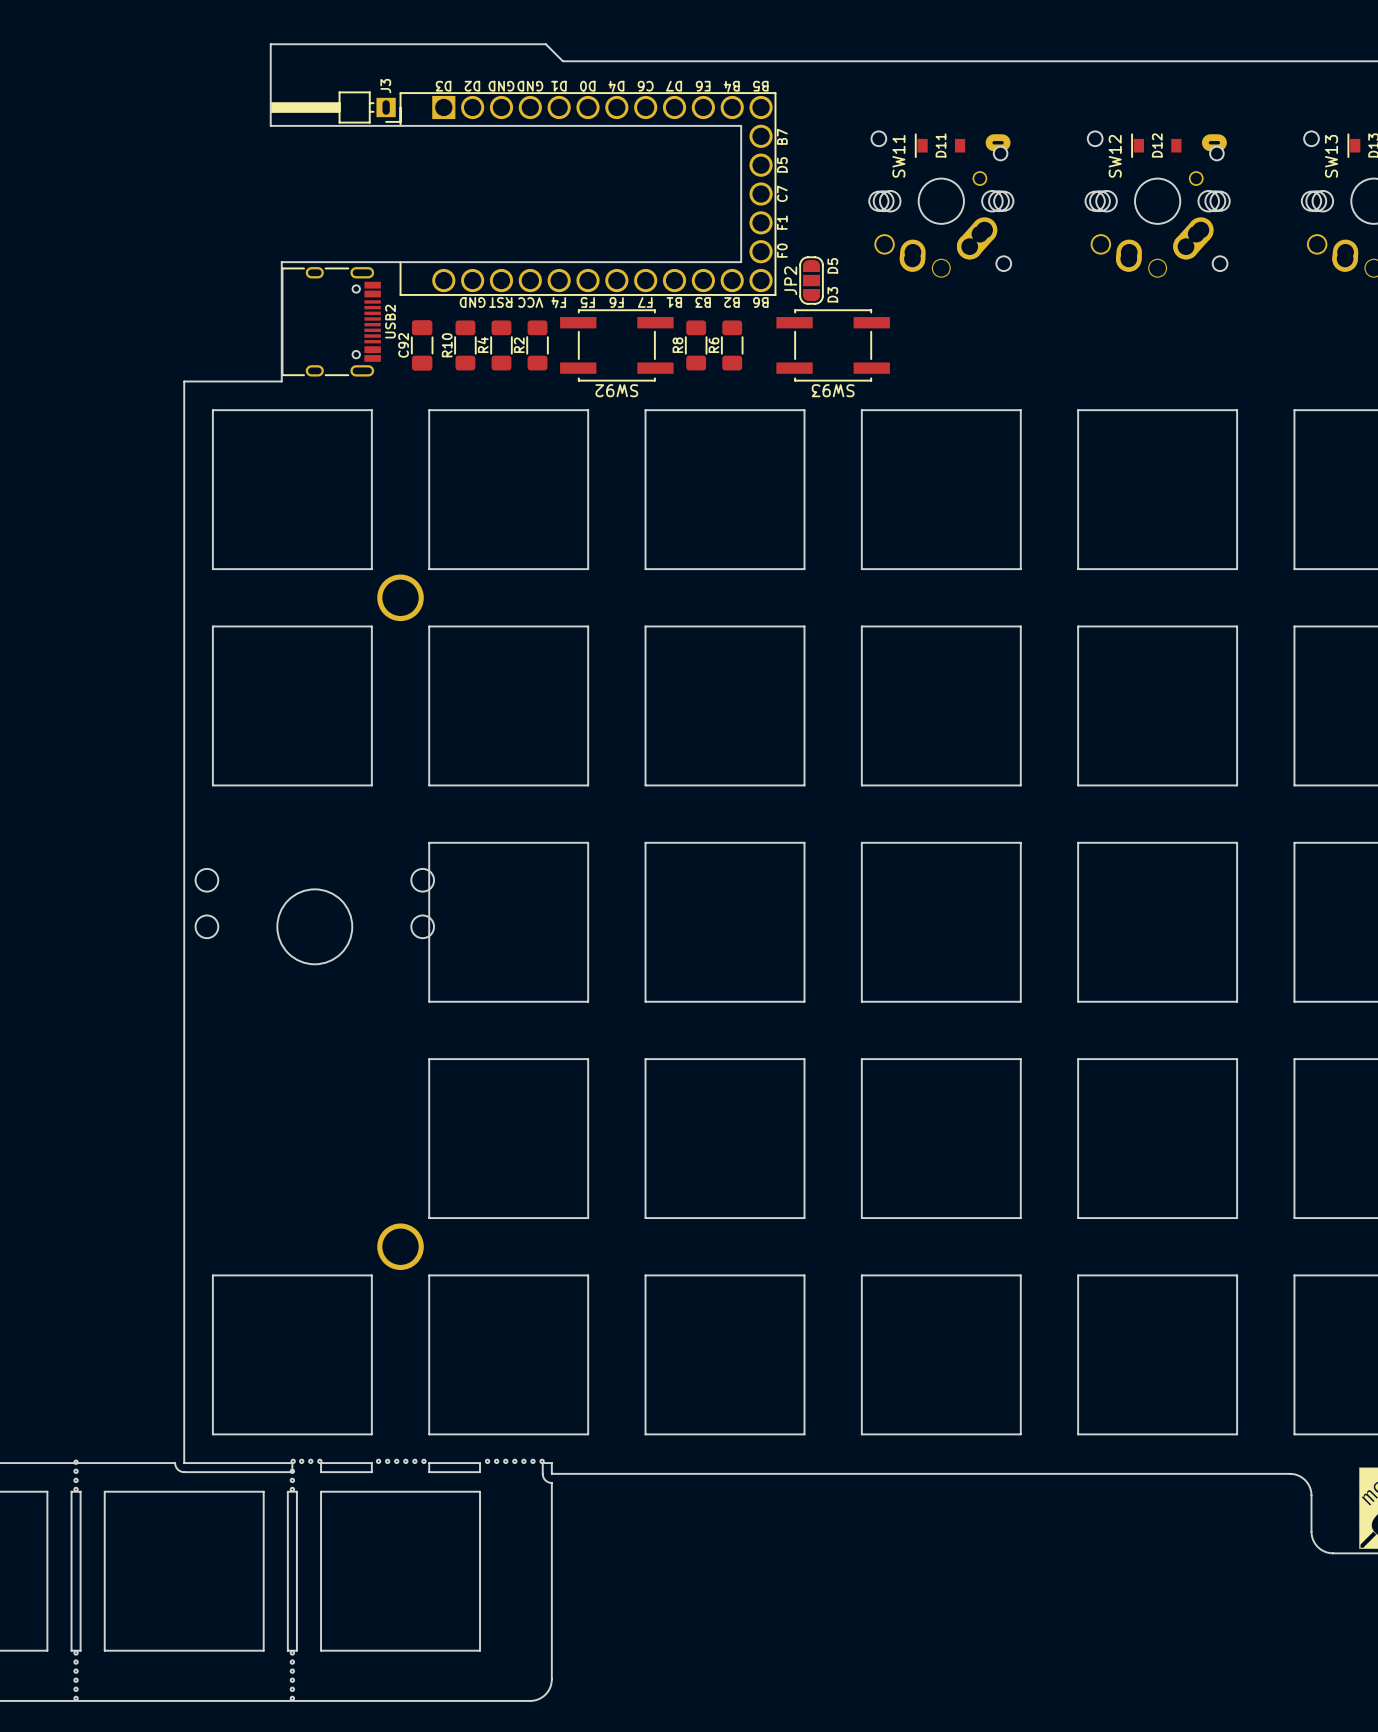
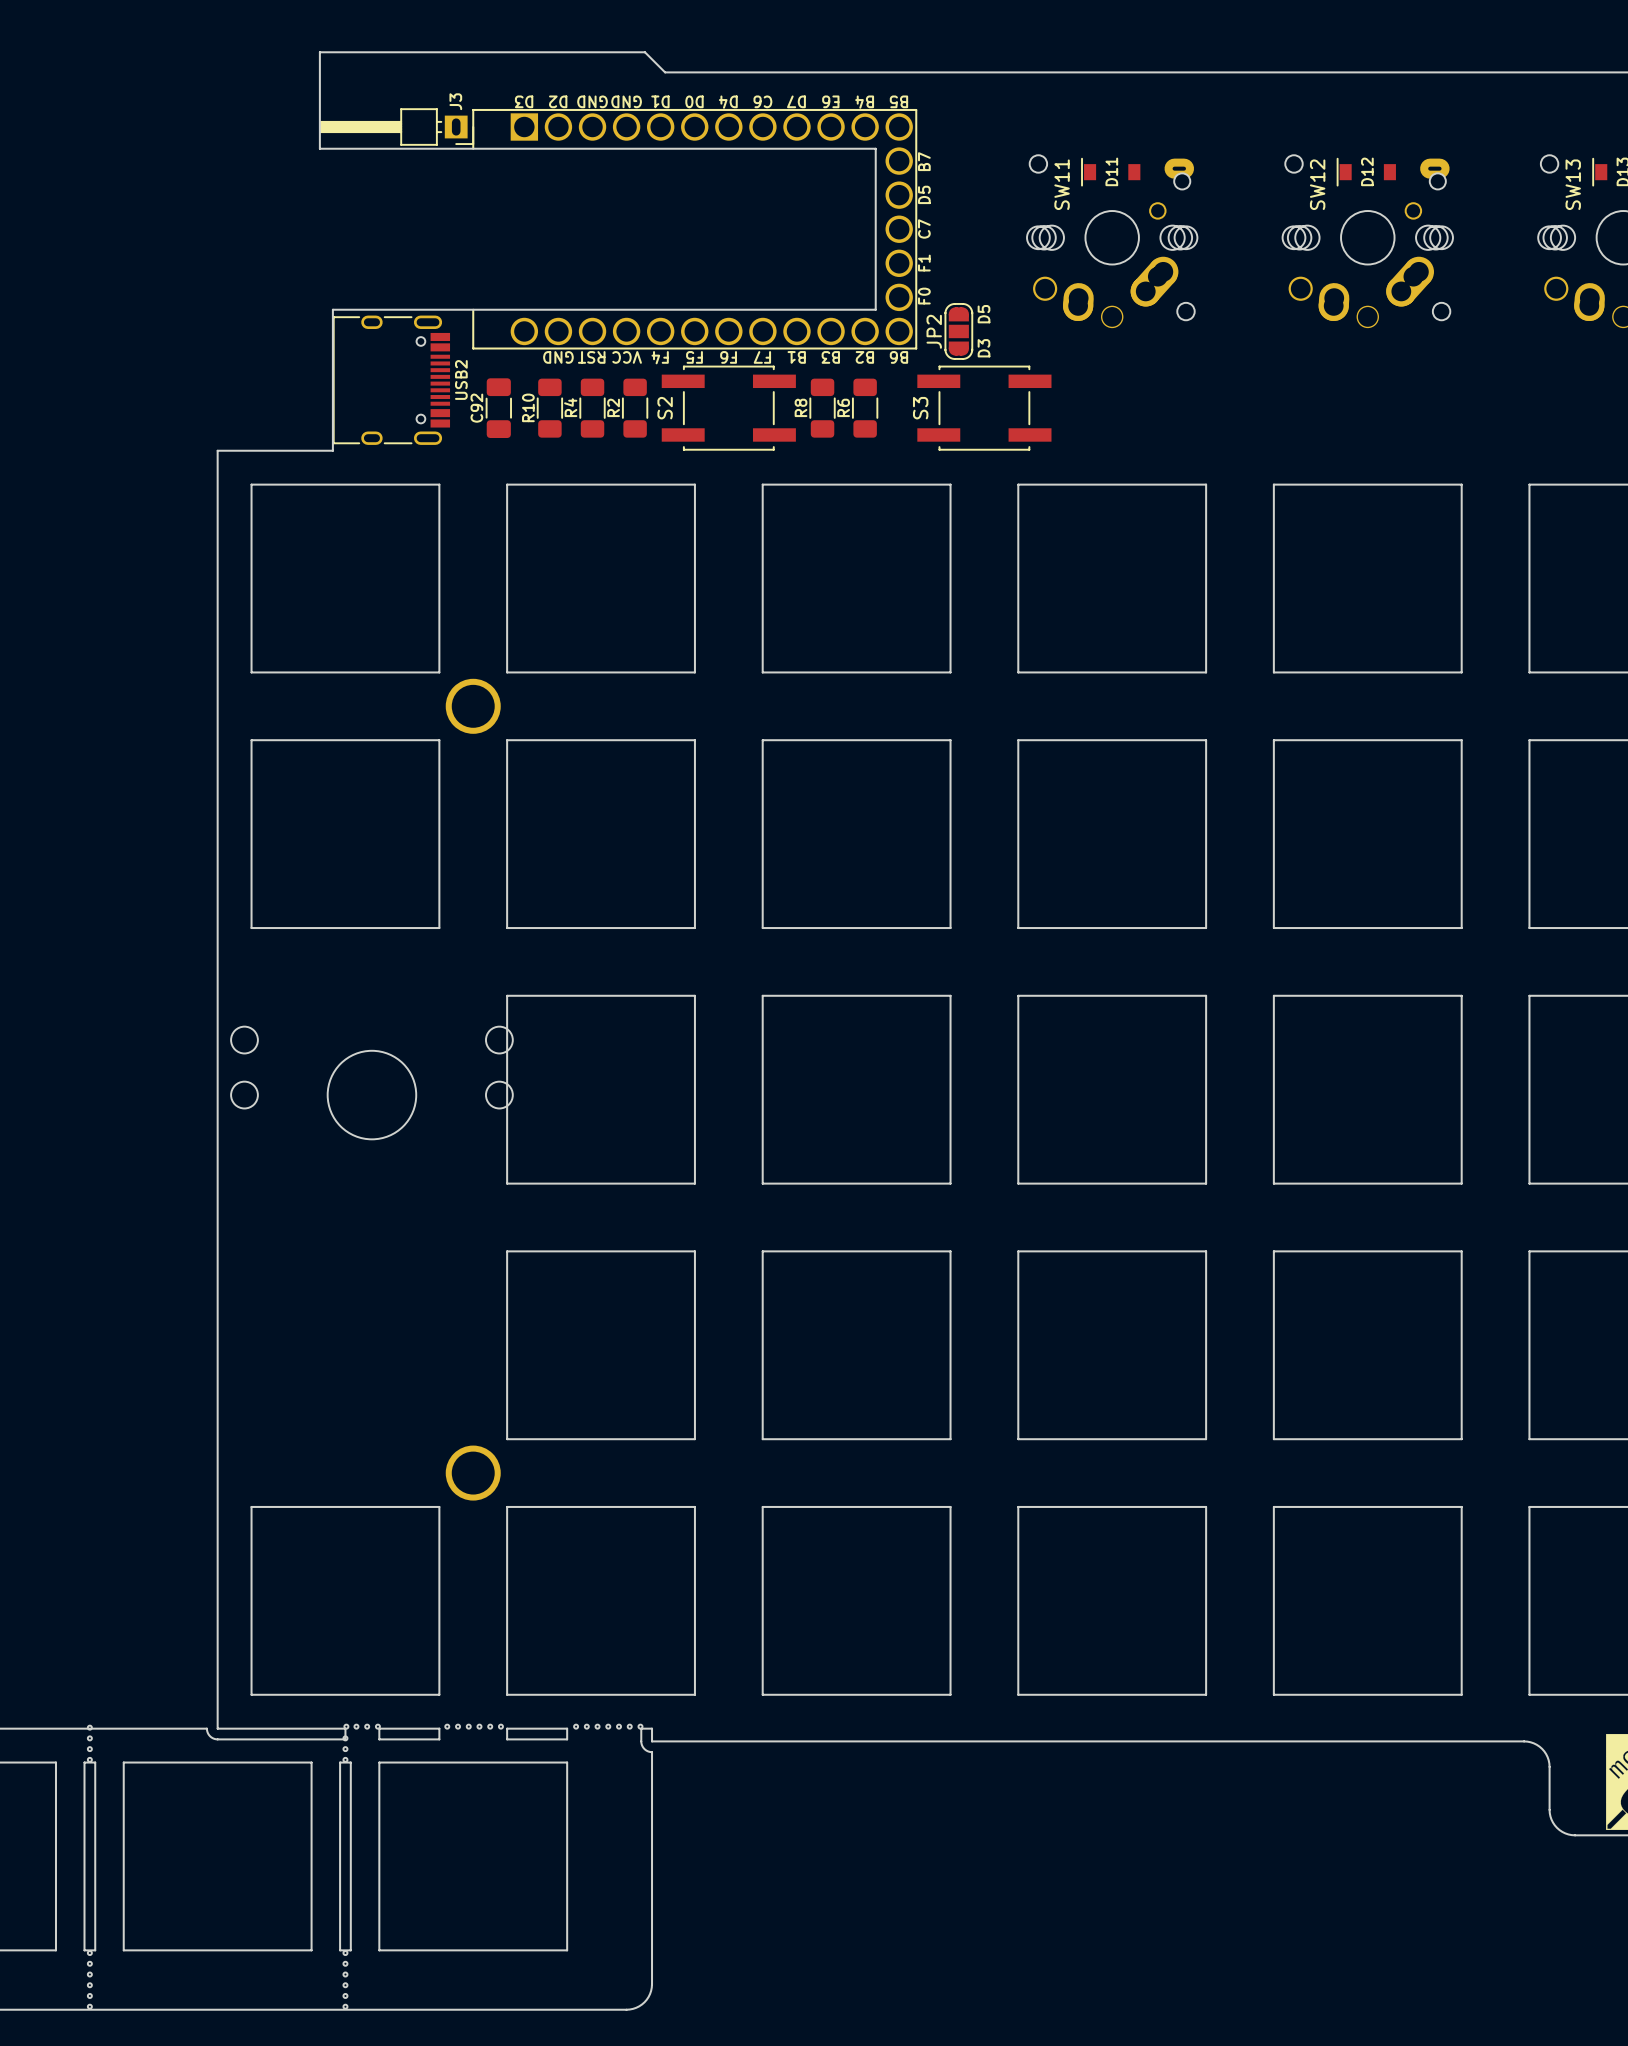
SW92 name: SW92 (616, 390) -> S2 (665, 408)
SW93 name: SW93 (833, 390) -> S3 (920, 408)

